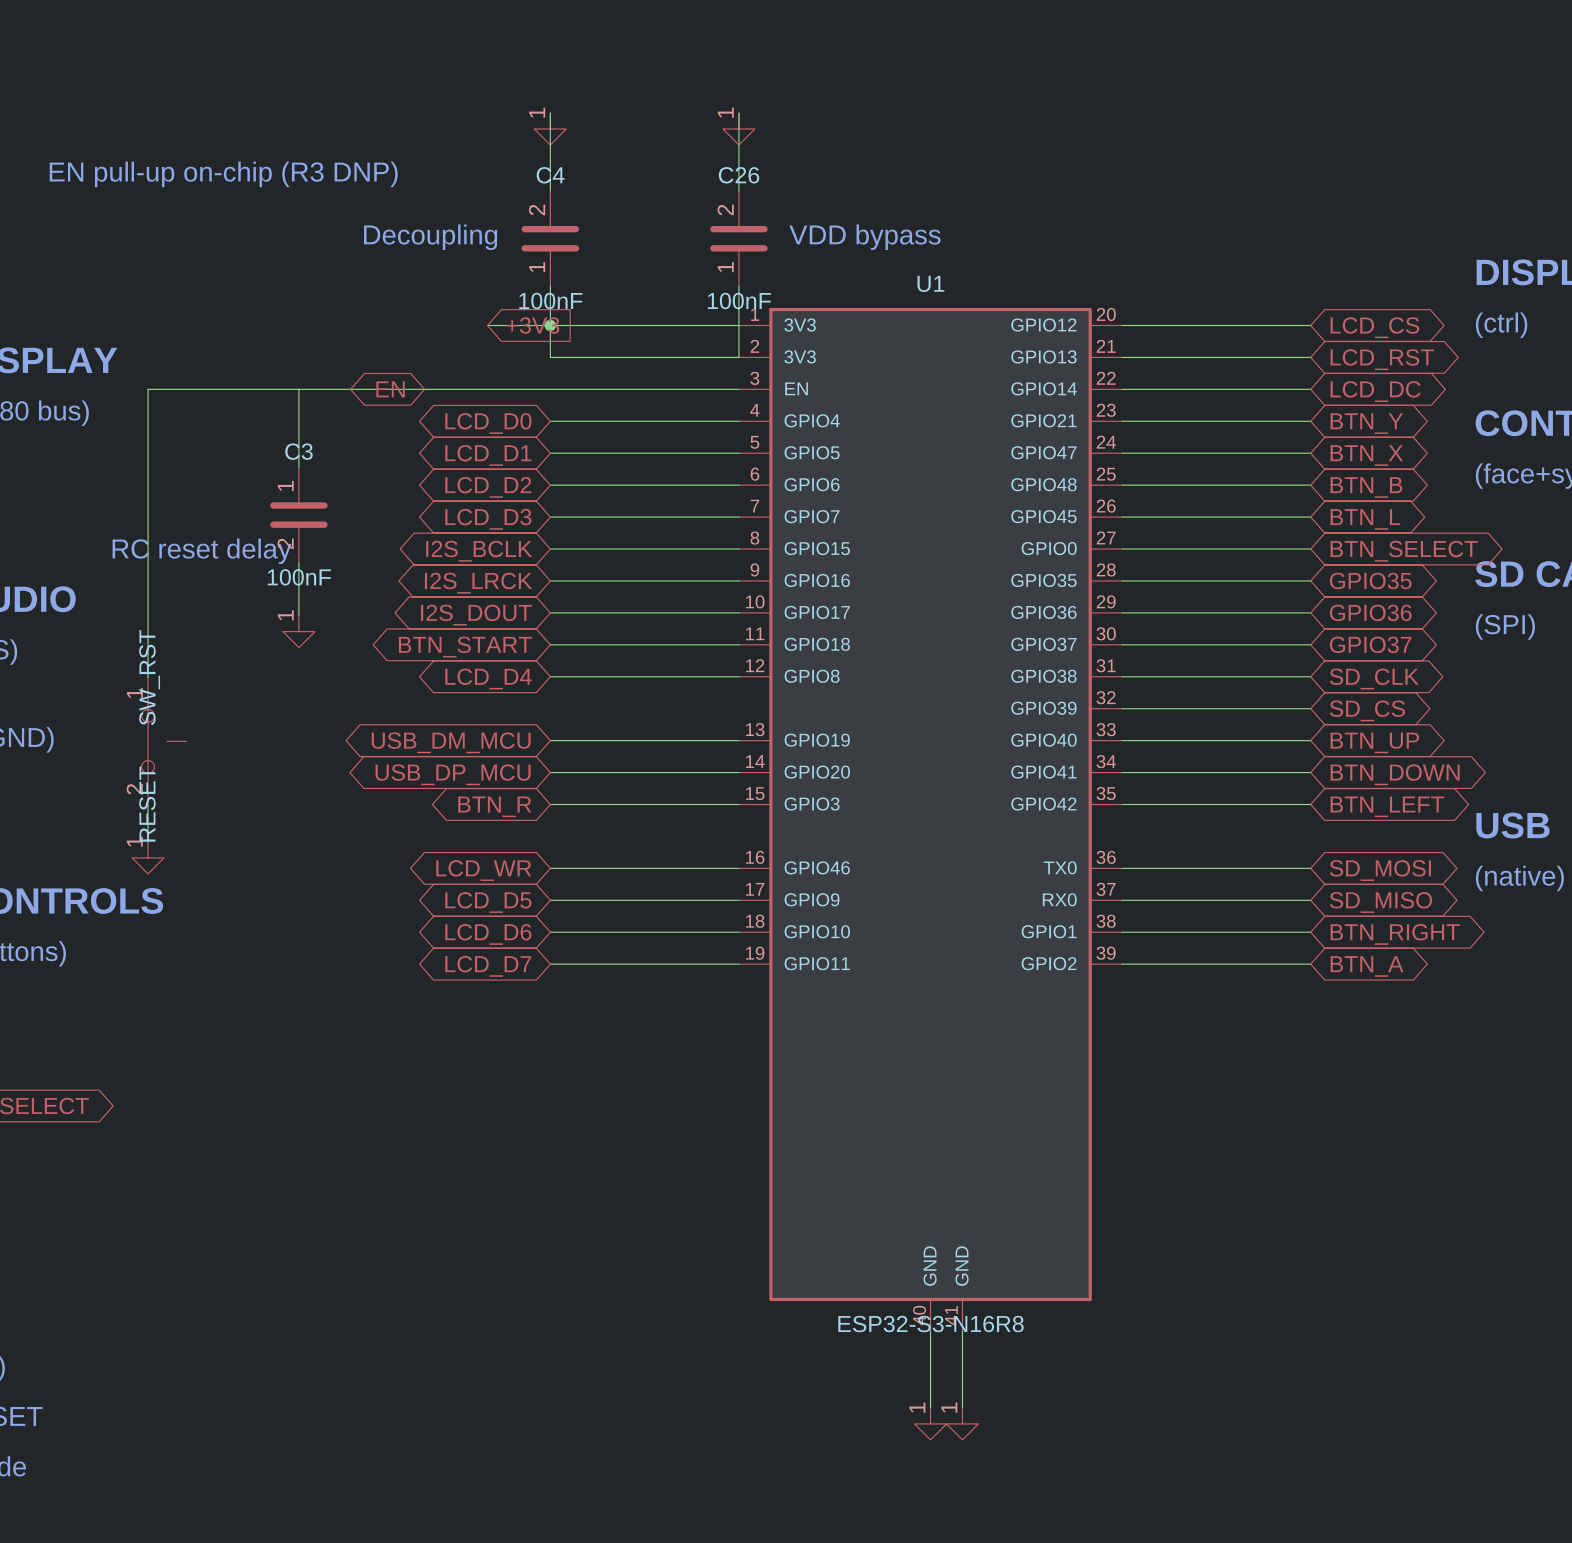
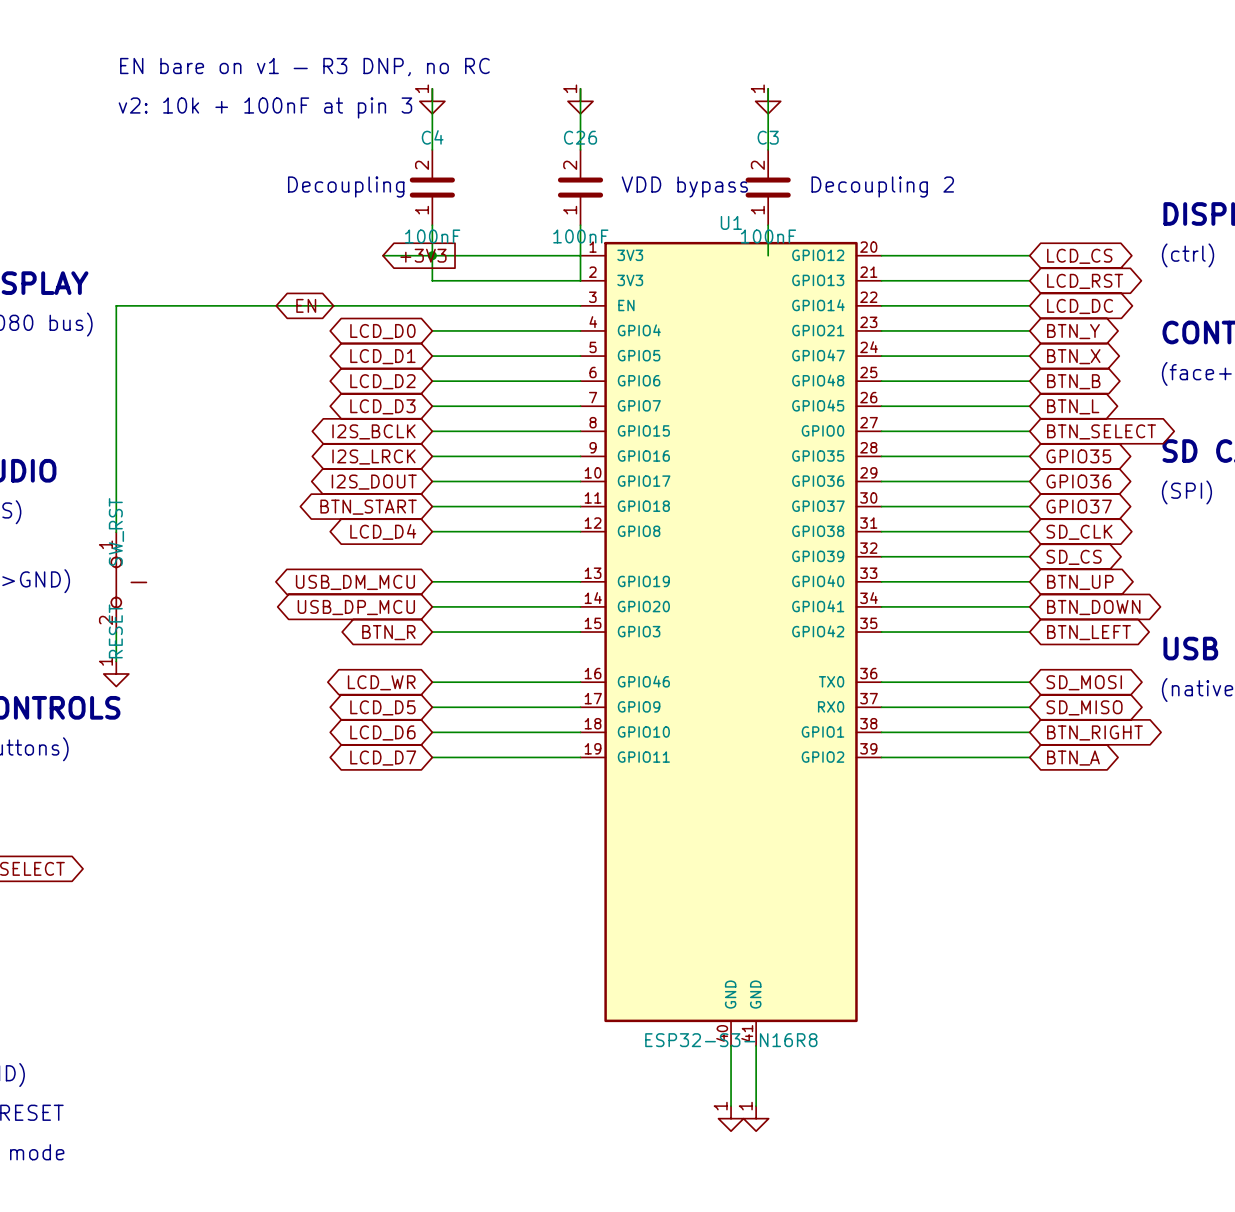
text: none -> EN bare on v1 — R3 DNP, no RC (304, 67)
wire: none -> (768, 88) (768, 149)
power symbol: none -> (768, 101)
text: none -> v2: 10k + 100nF at pin 3 (265, 107)
text: EN pull-up on-chip (R3 DNP) (223, 174) -> none
text: none -> Decoupling 2 (882, 187)
wire: none -> (768, 225) (768, 255)
wire: (298, 389) (298, 467) -> none
C3 rotation: 0° (298, 515) -> 180° (768, 187)
C3 position: (298, 515) -> (768, 187)
text: RC reset delay (202, 551) -> none
wire: (298, 562) (298, 615) -> none
power symbol: (298, 631) -> none

